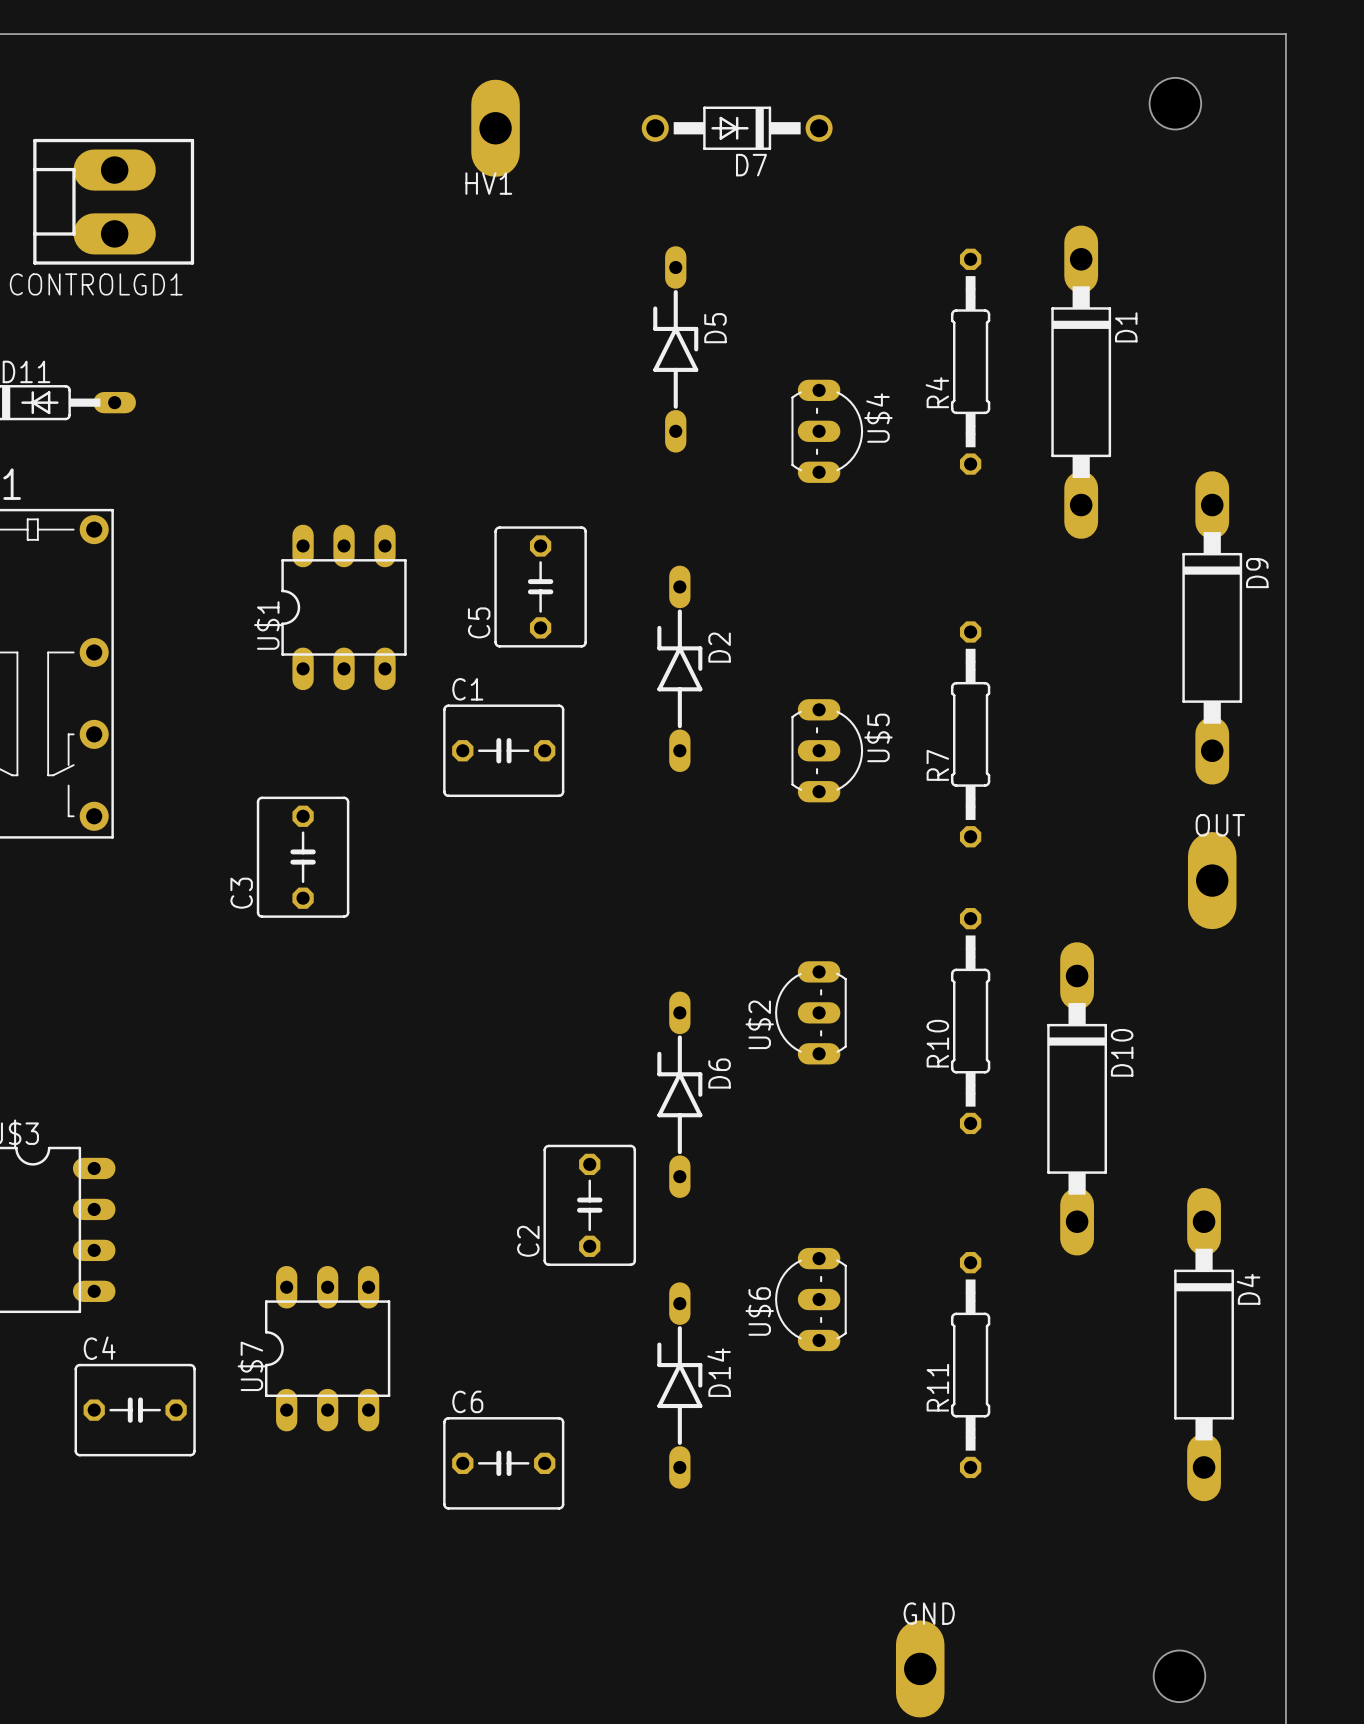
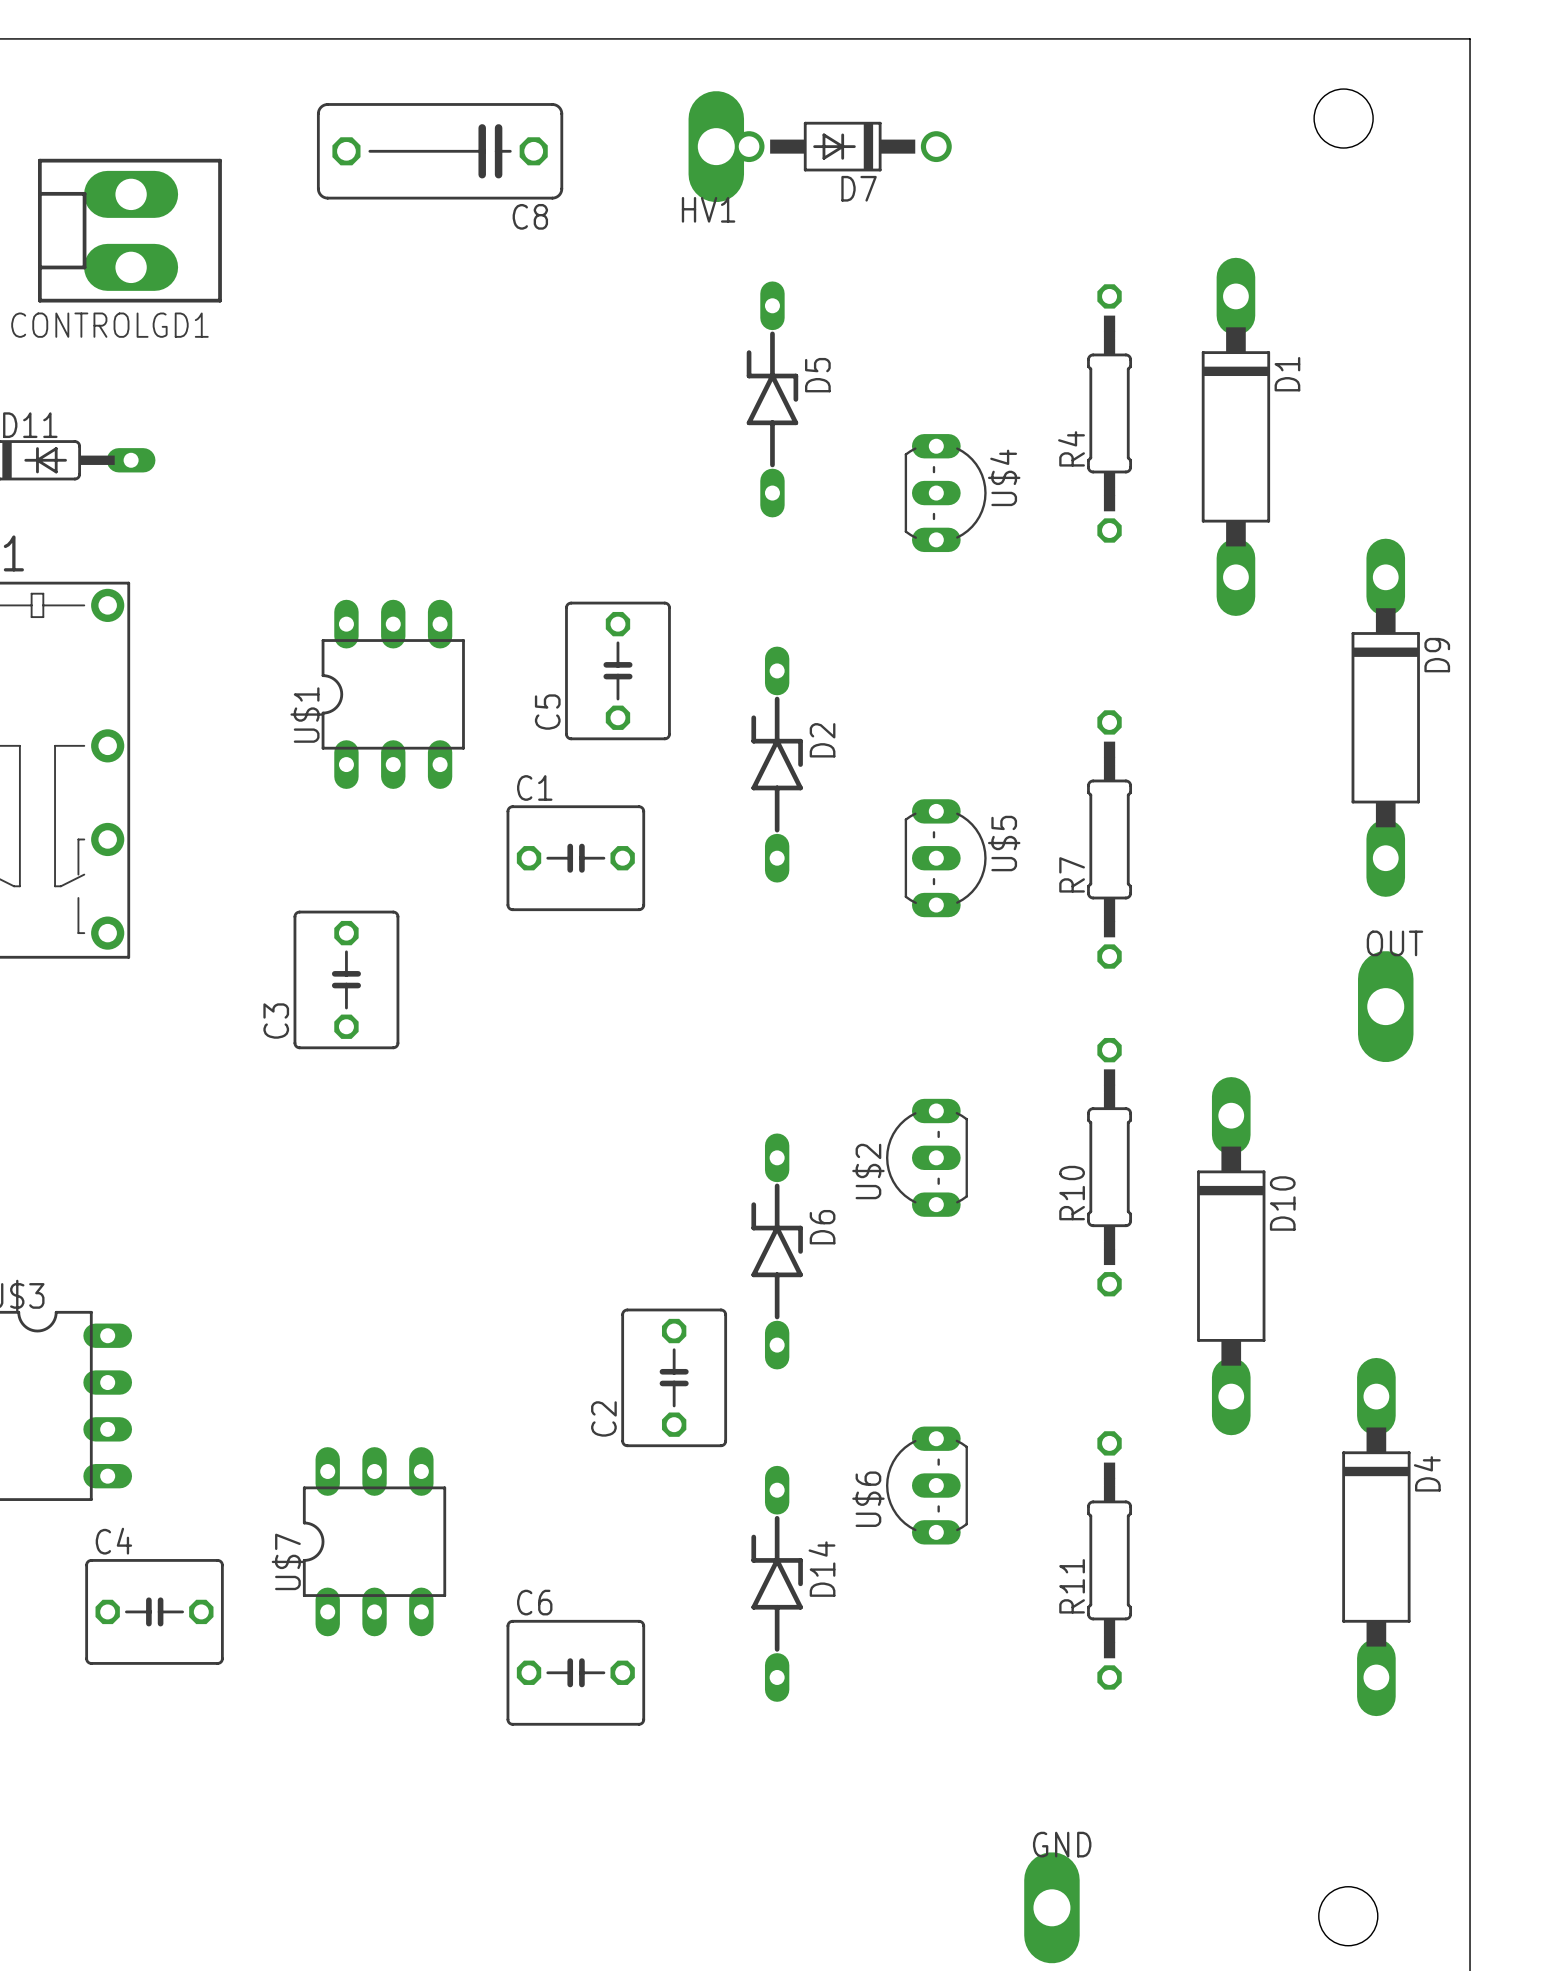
HV1 position: (495, 128) -> (716, 146)
C8: none -> (440, 151)

